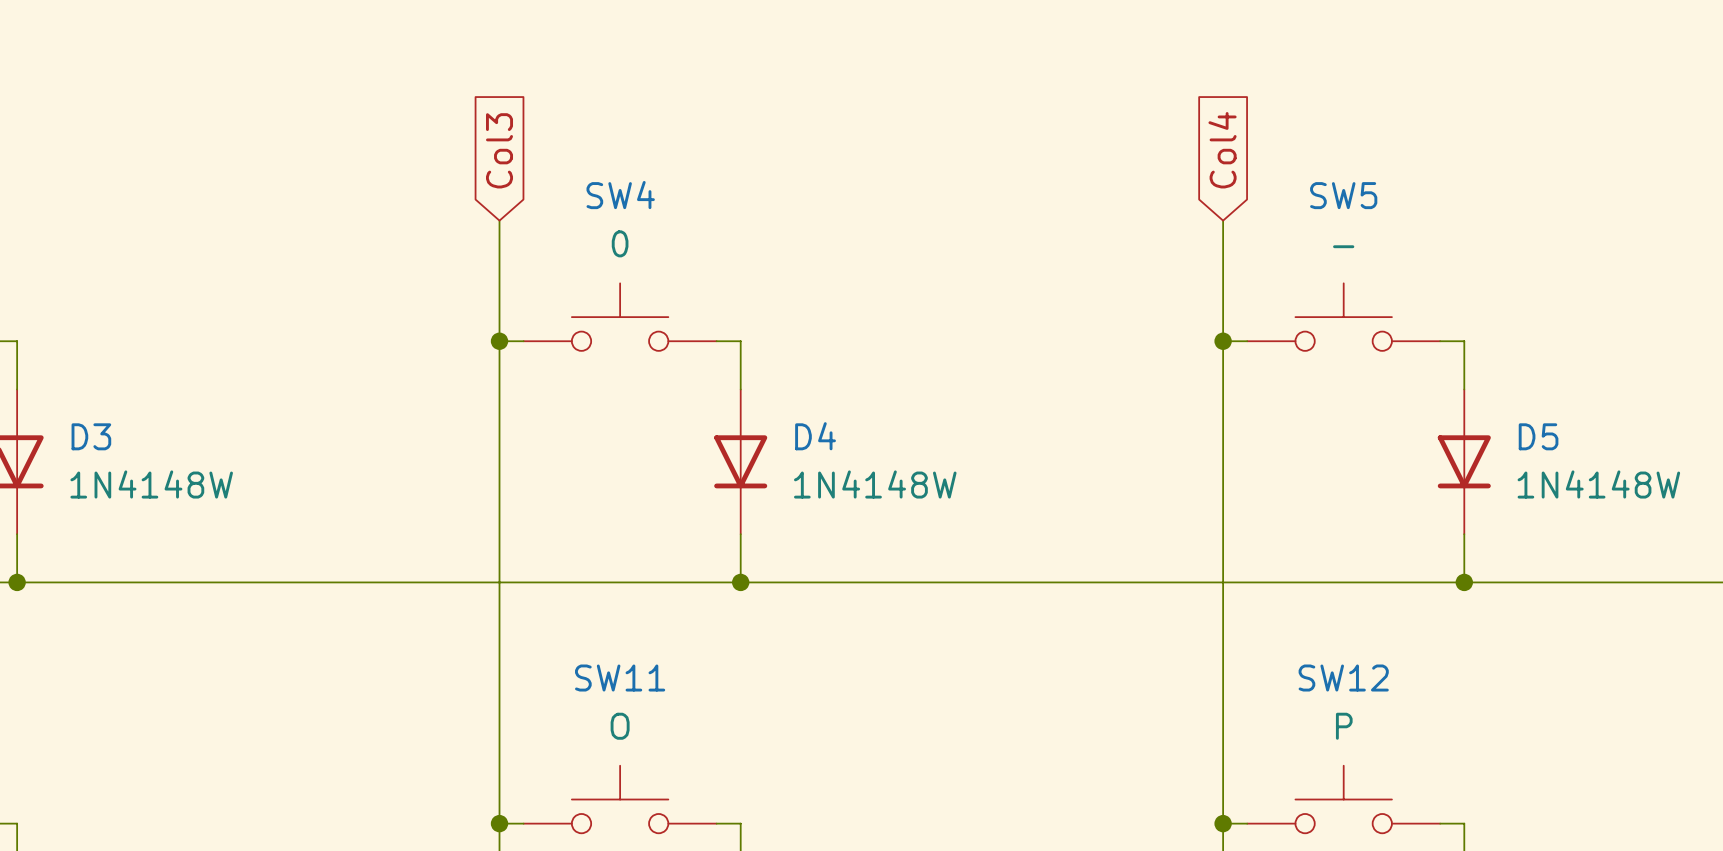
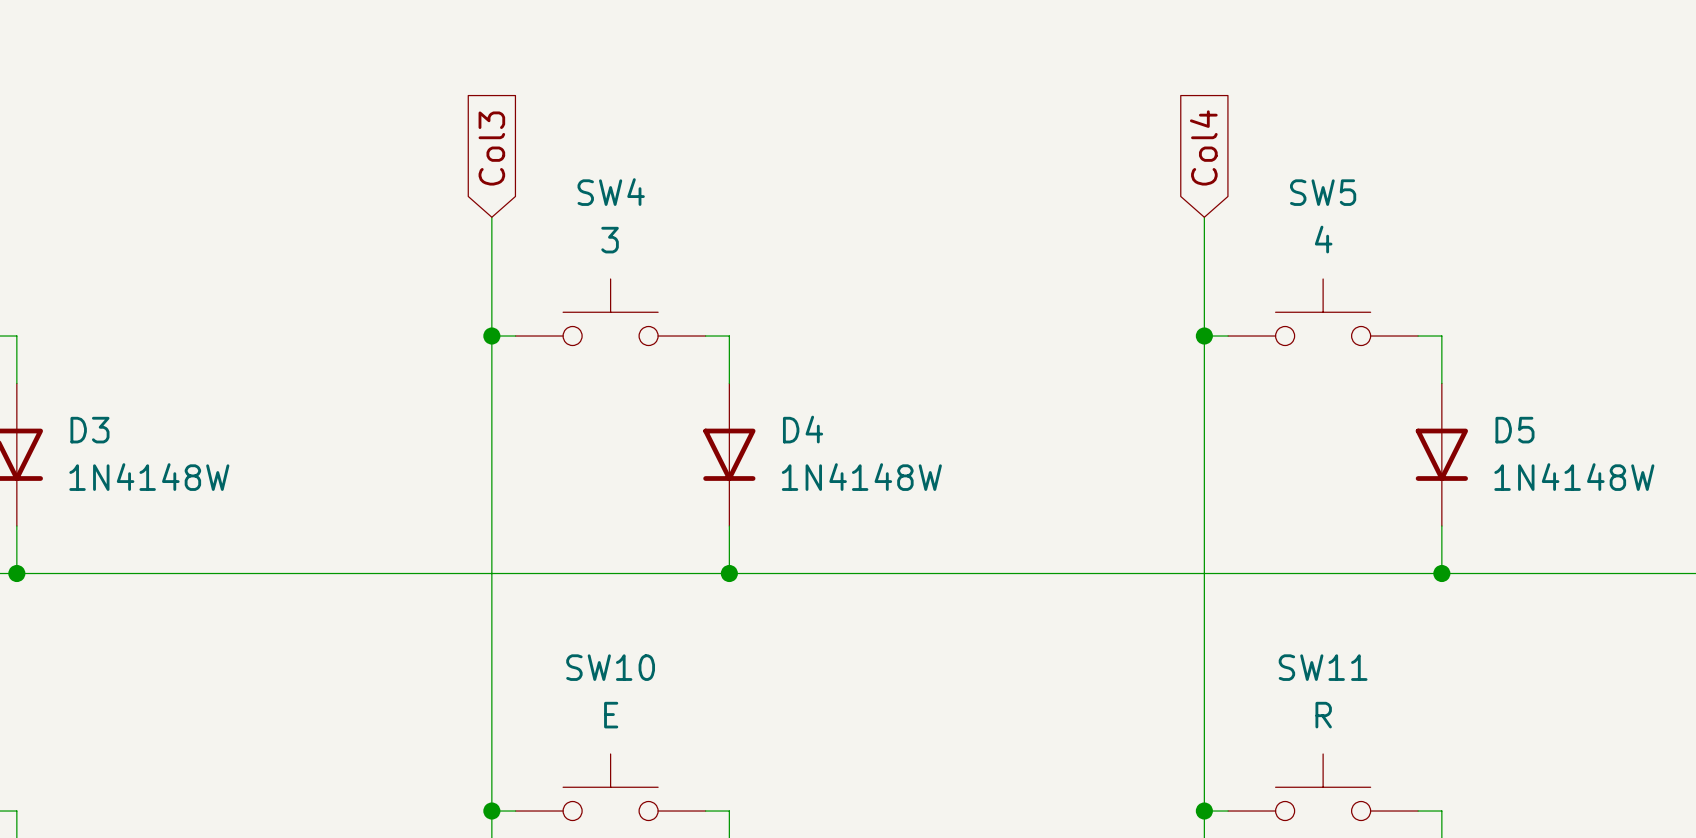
SW4 value: 0 (620, 243) -> 3 (610, 240)
SW5 value: - (1343, 246) -> 4 (1323, 239)
SW11 name: SW11 (620, 678) -> SW10 (610, 667)
SW12 name: SW12 (1343, 678) -> SW11 (1323, 667)
SW11 value: O (620, 726) -> E (611, 715)
SW12 value: P (1344, 726) -> R (1323, 715)

